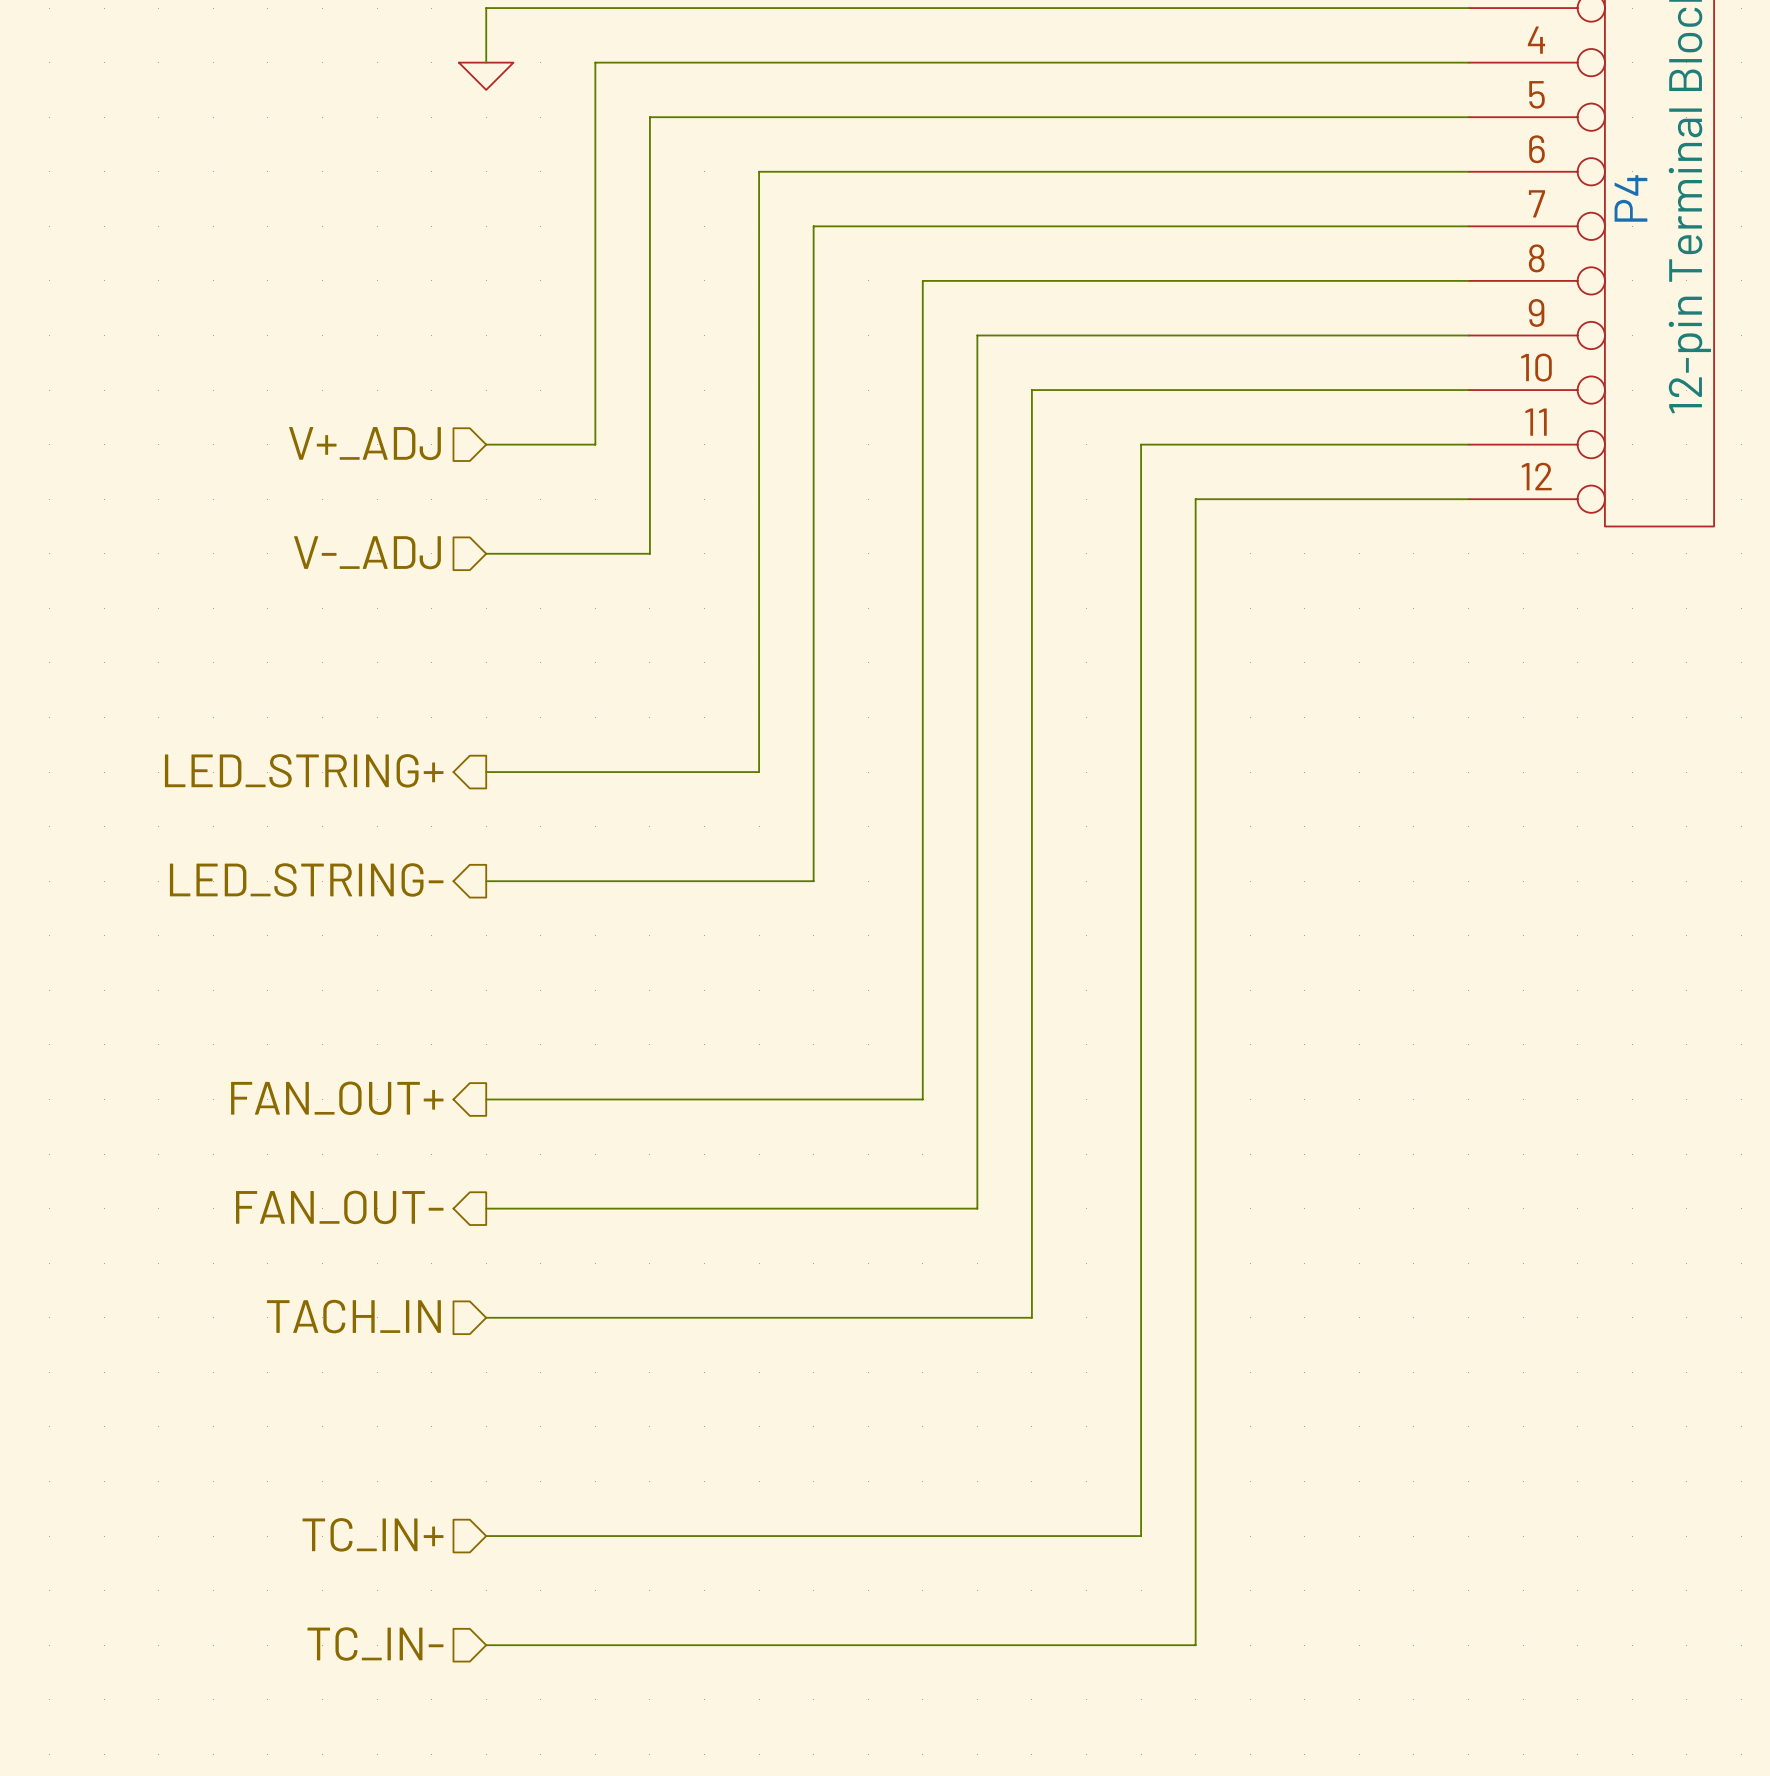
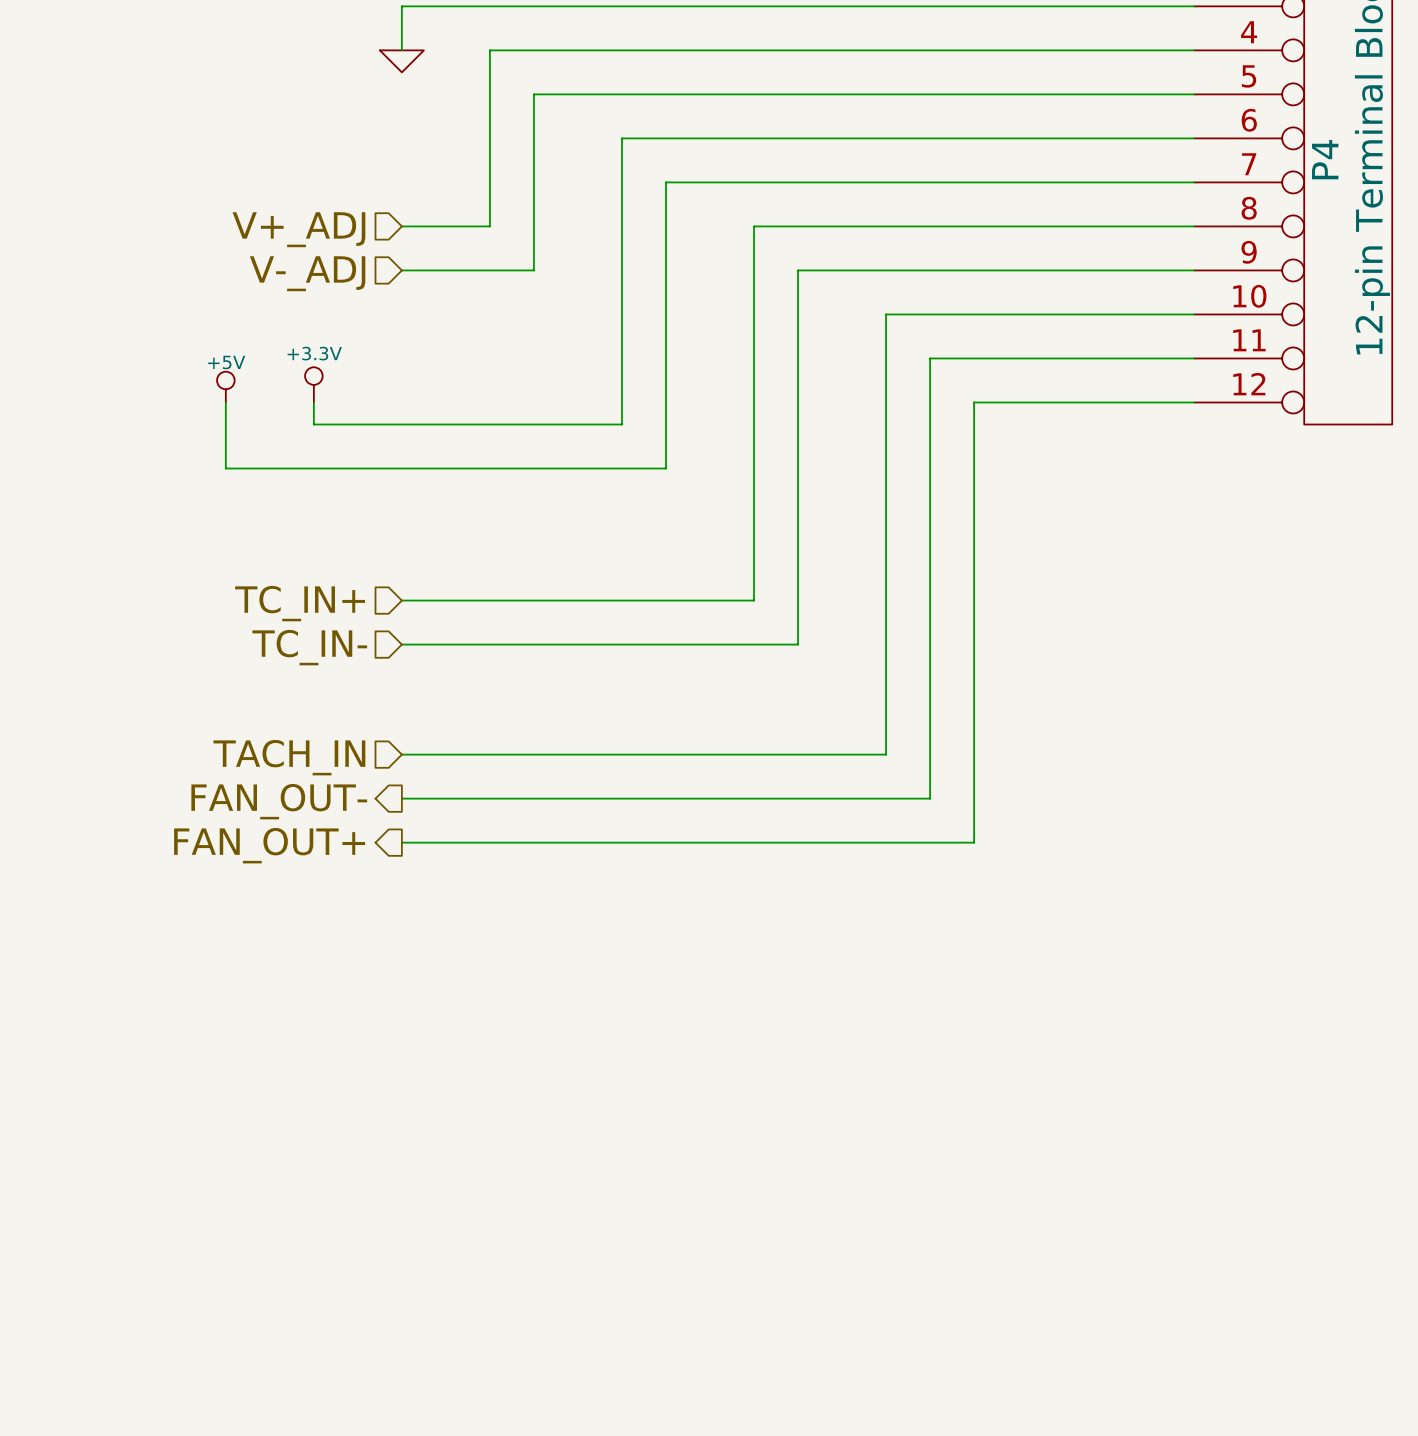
wire: (595, 280) (595, 444) (486, 444) -> (489, 226) (401, 226)
wire: (649, 335) (649, 553) (486, 553) -> (533, 270) (401, 270)
wire: (1086, 390) (1031, 390) (1031, 1317) (486, 1317) -> (886, 314) (886, 754) (401, 754)
hierarchical label position: V+_ADJ (364, 443) -> V+_ADJ (298, 229)
power symbol: none -> +3.3V (313, 384)
power symbol: none -> +5V (225, 387)
wire: (759, 526) (759, 772) (486, 772) -> (621, 424) (313, 424) (313, 402)
hierarchical label position: V-_ADJ (367, 552) -> V-_ADJ (307, 273)
wire: (813, 581) (813, 881) (486, 881) -> (665, 468) (225, 468) (225, 402)
hierarchical label: none -> TC_IN+ (300, 603)
wire: (922, 744) (922, 1099) (486, 1099) -> (754, 600) (401, 600)
hierarchical label: LED_STRING+ (304, 770) -> none
hierarchical label: none -> TC_IN- (309, 647)
wire: (977, 799) (977, 1208) (486, 1208) -> (798, 644) (401, 644)
hierarchical label: LED_STRING- (306, 879) -> none
wire: (1141, 990) (1141, 1536) (486, 1536) -> (930, 798) (401, 798)
wire: (1195, 1044) (1195, 1645) (486, 1645) -> (974, 842) (401, 842)
hierarchical label position: FAN_OUT+ (337, 1098) -> FAN_OUT+ (269, 845)
hierarchical label position: FAN_OUT- (339, 1207) -> FAN_OUT- (279, 801)
hierarchical label position: TACH_IN (353, 1316) -> TACH_IN (289, 757)
hierarchical label: TC_IN+ (372, 1534) -> none
hierarchical label: TC_IN- (375, 1644) -> none

